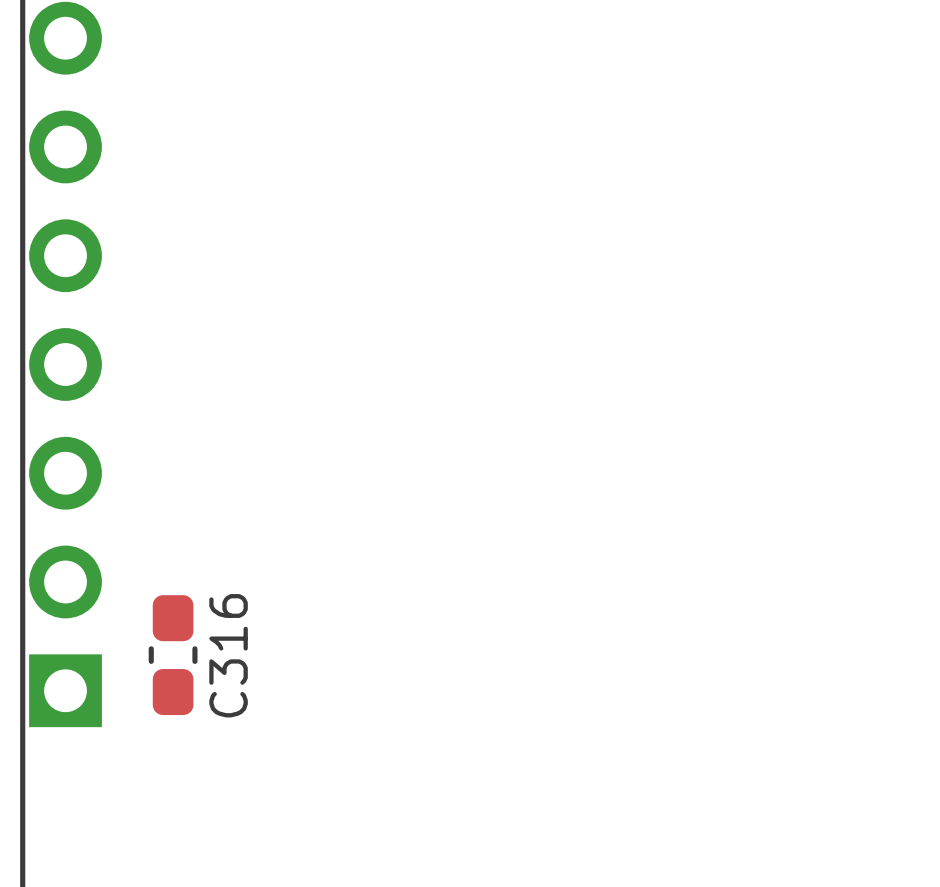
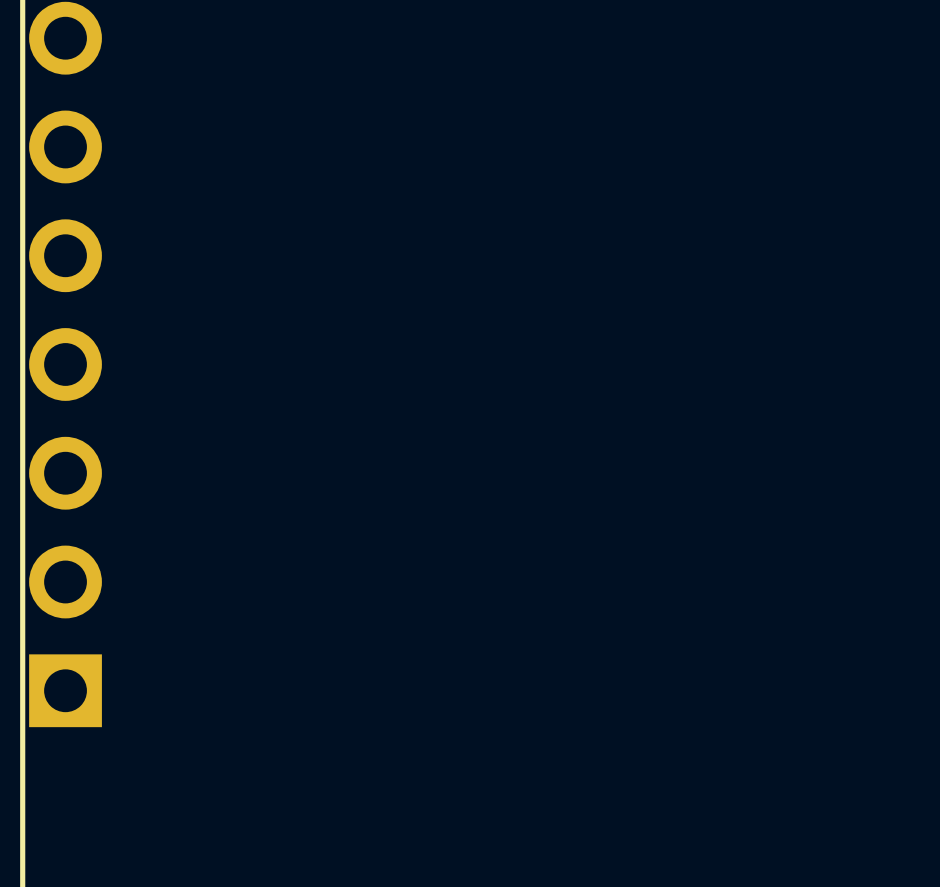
C316: (173, 655) -> none

